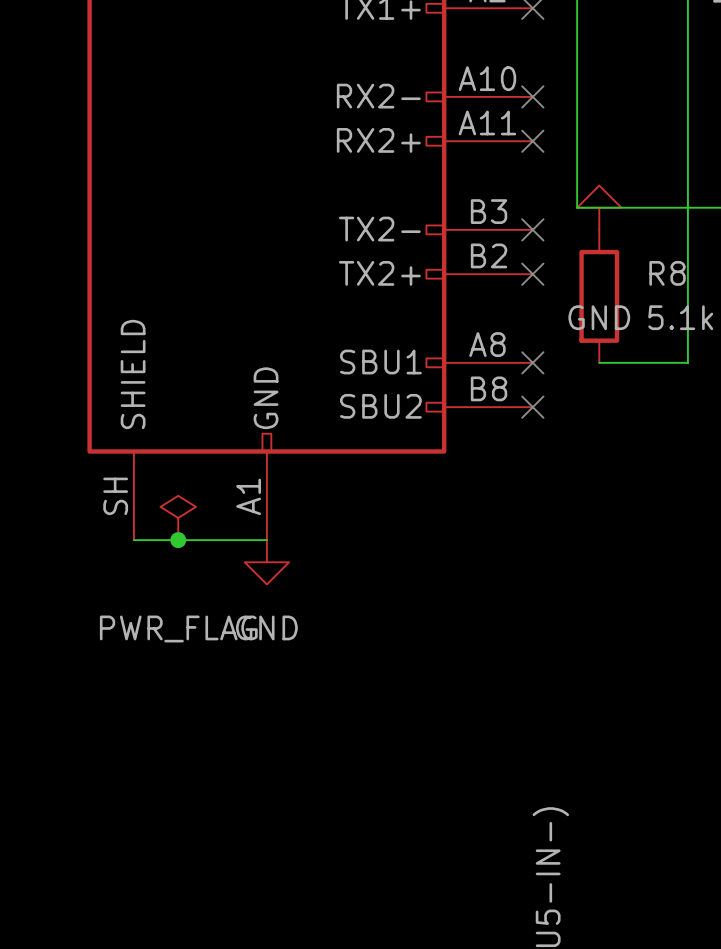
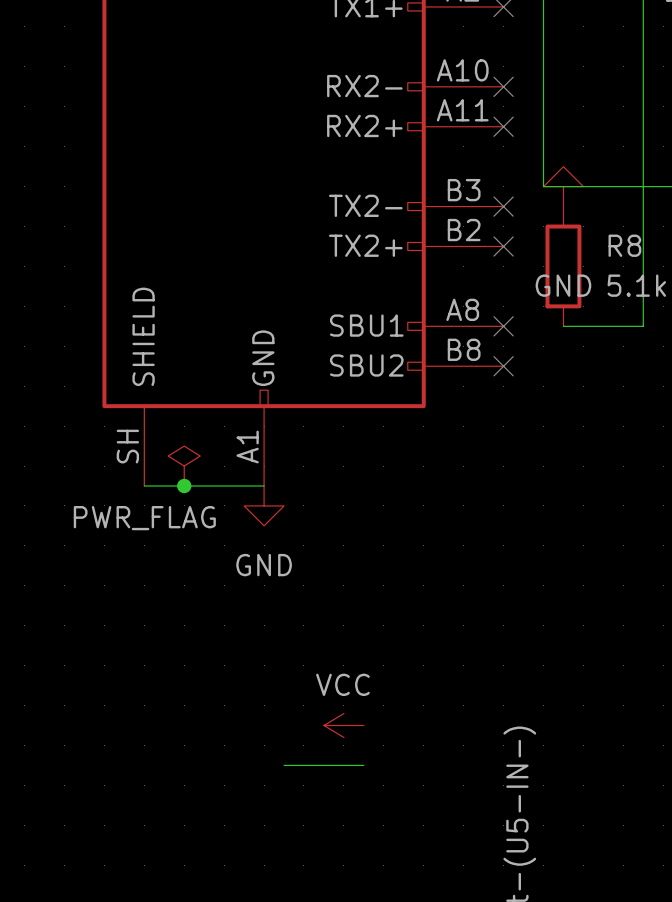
power symbol text position: PWR_FLAG (178, 628) -> PWR_FLAG (144, 518)
power symbol: none -> VCC (343, 725)
wire: none -> (284, 765) (363, 765)

